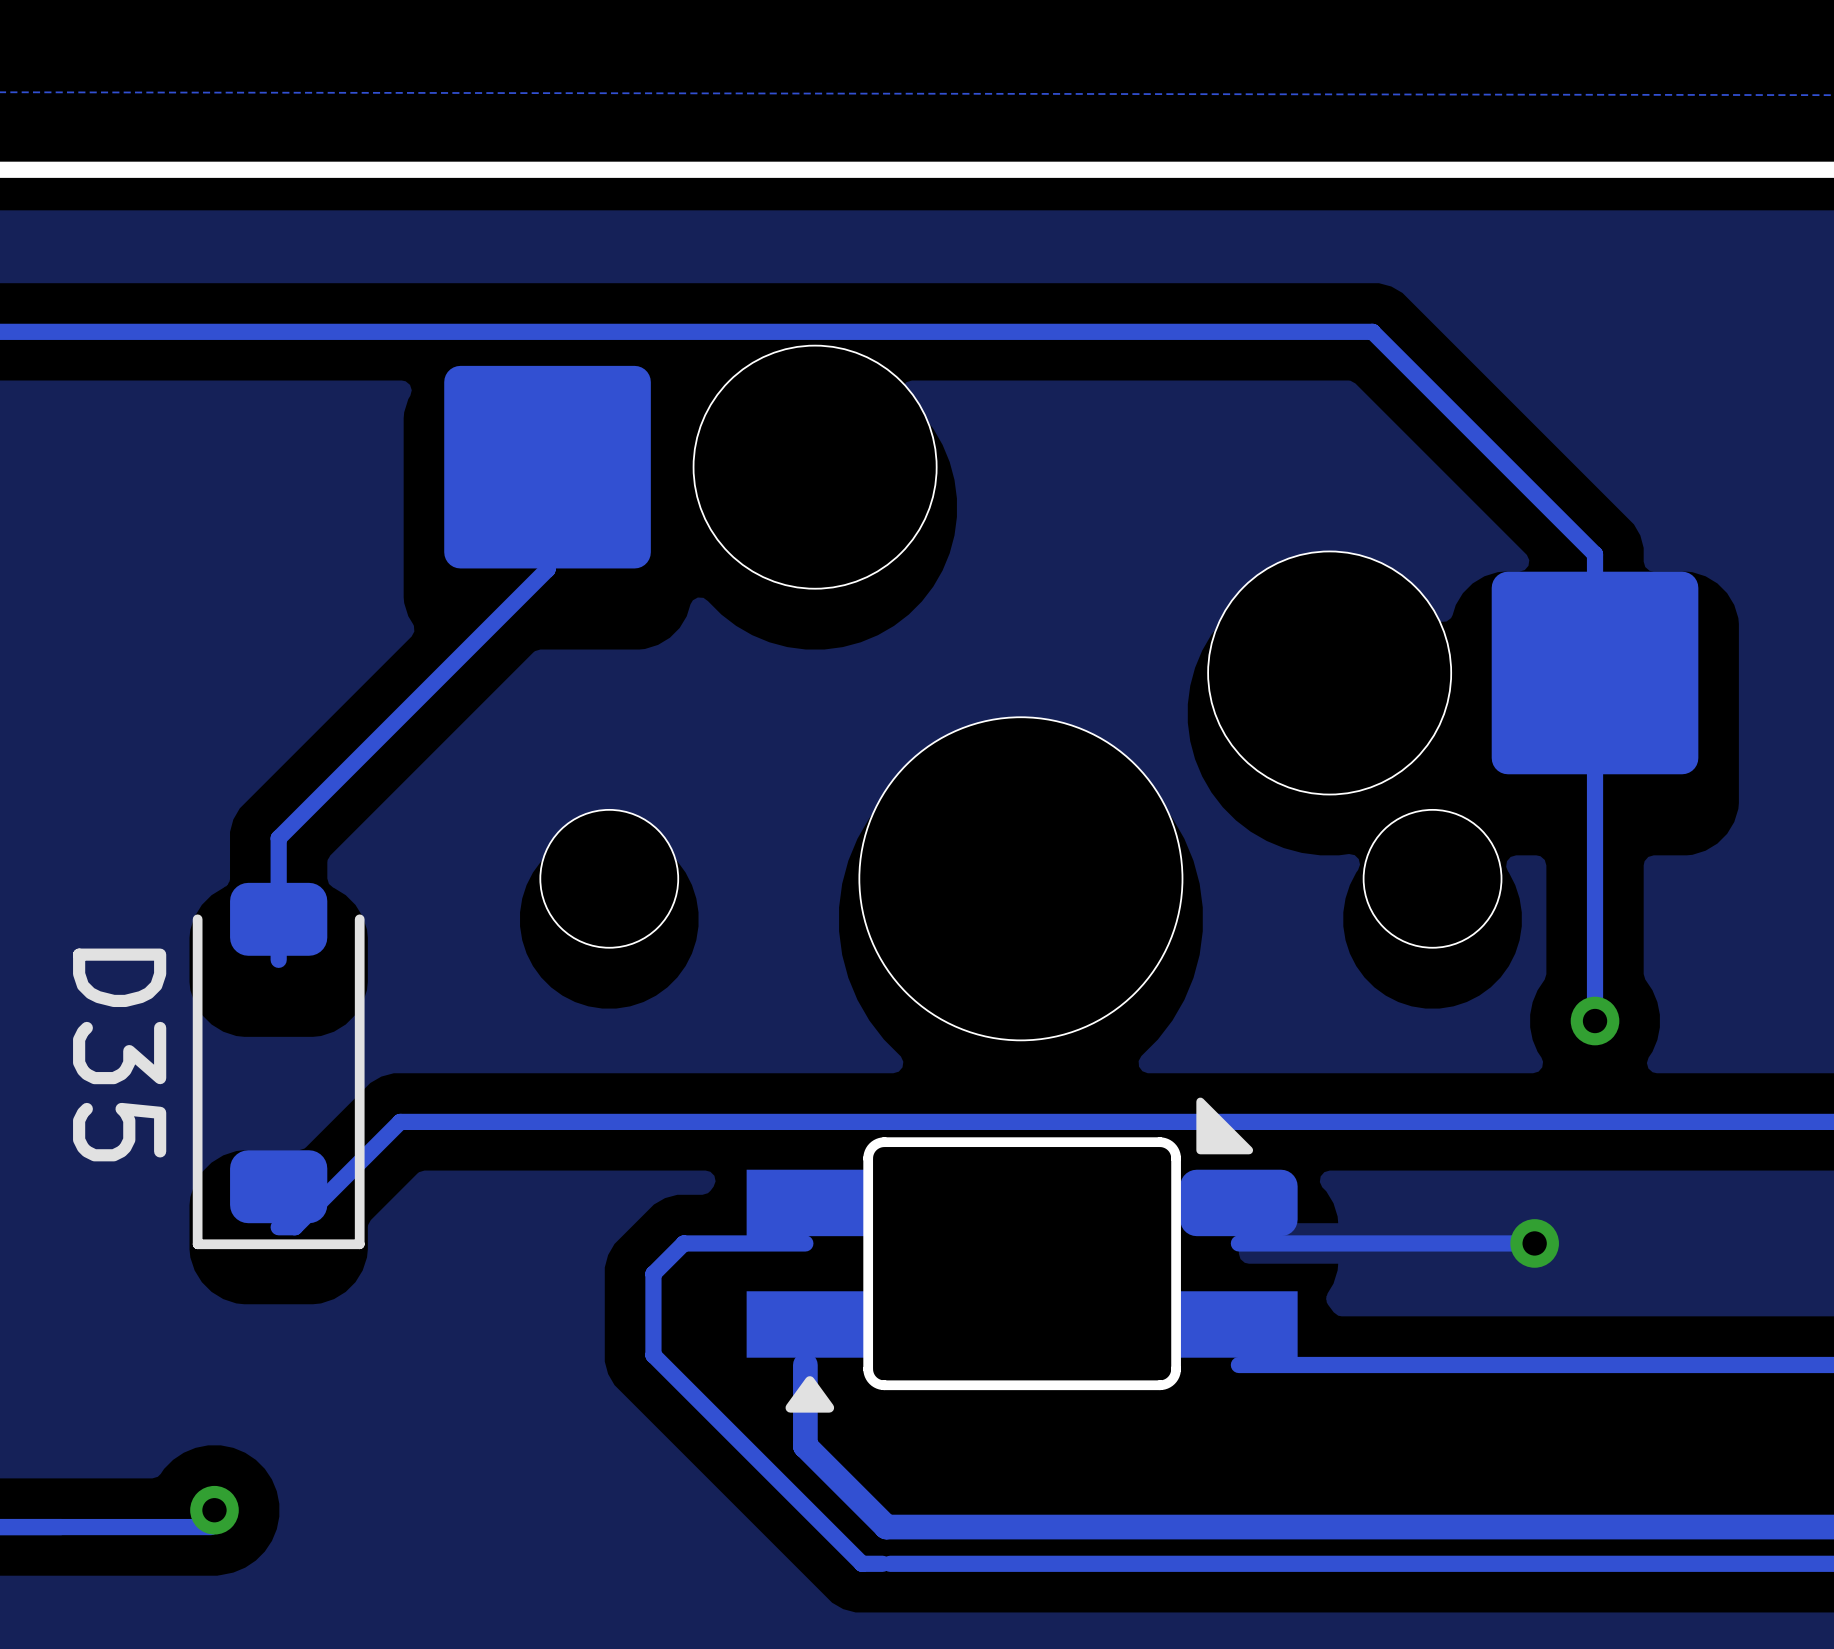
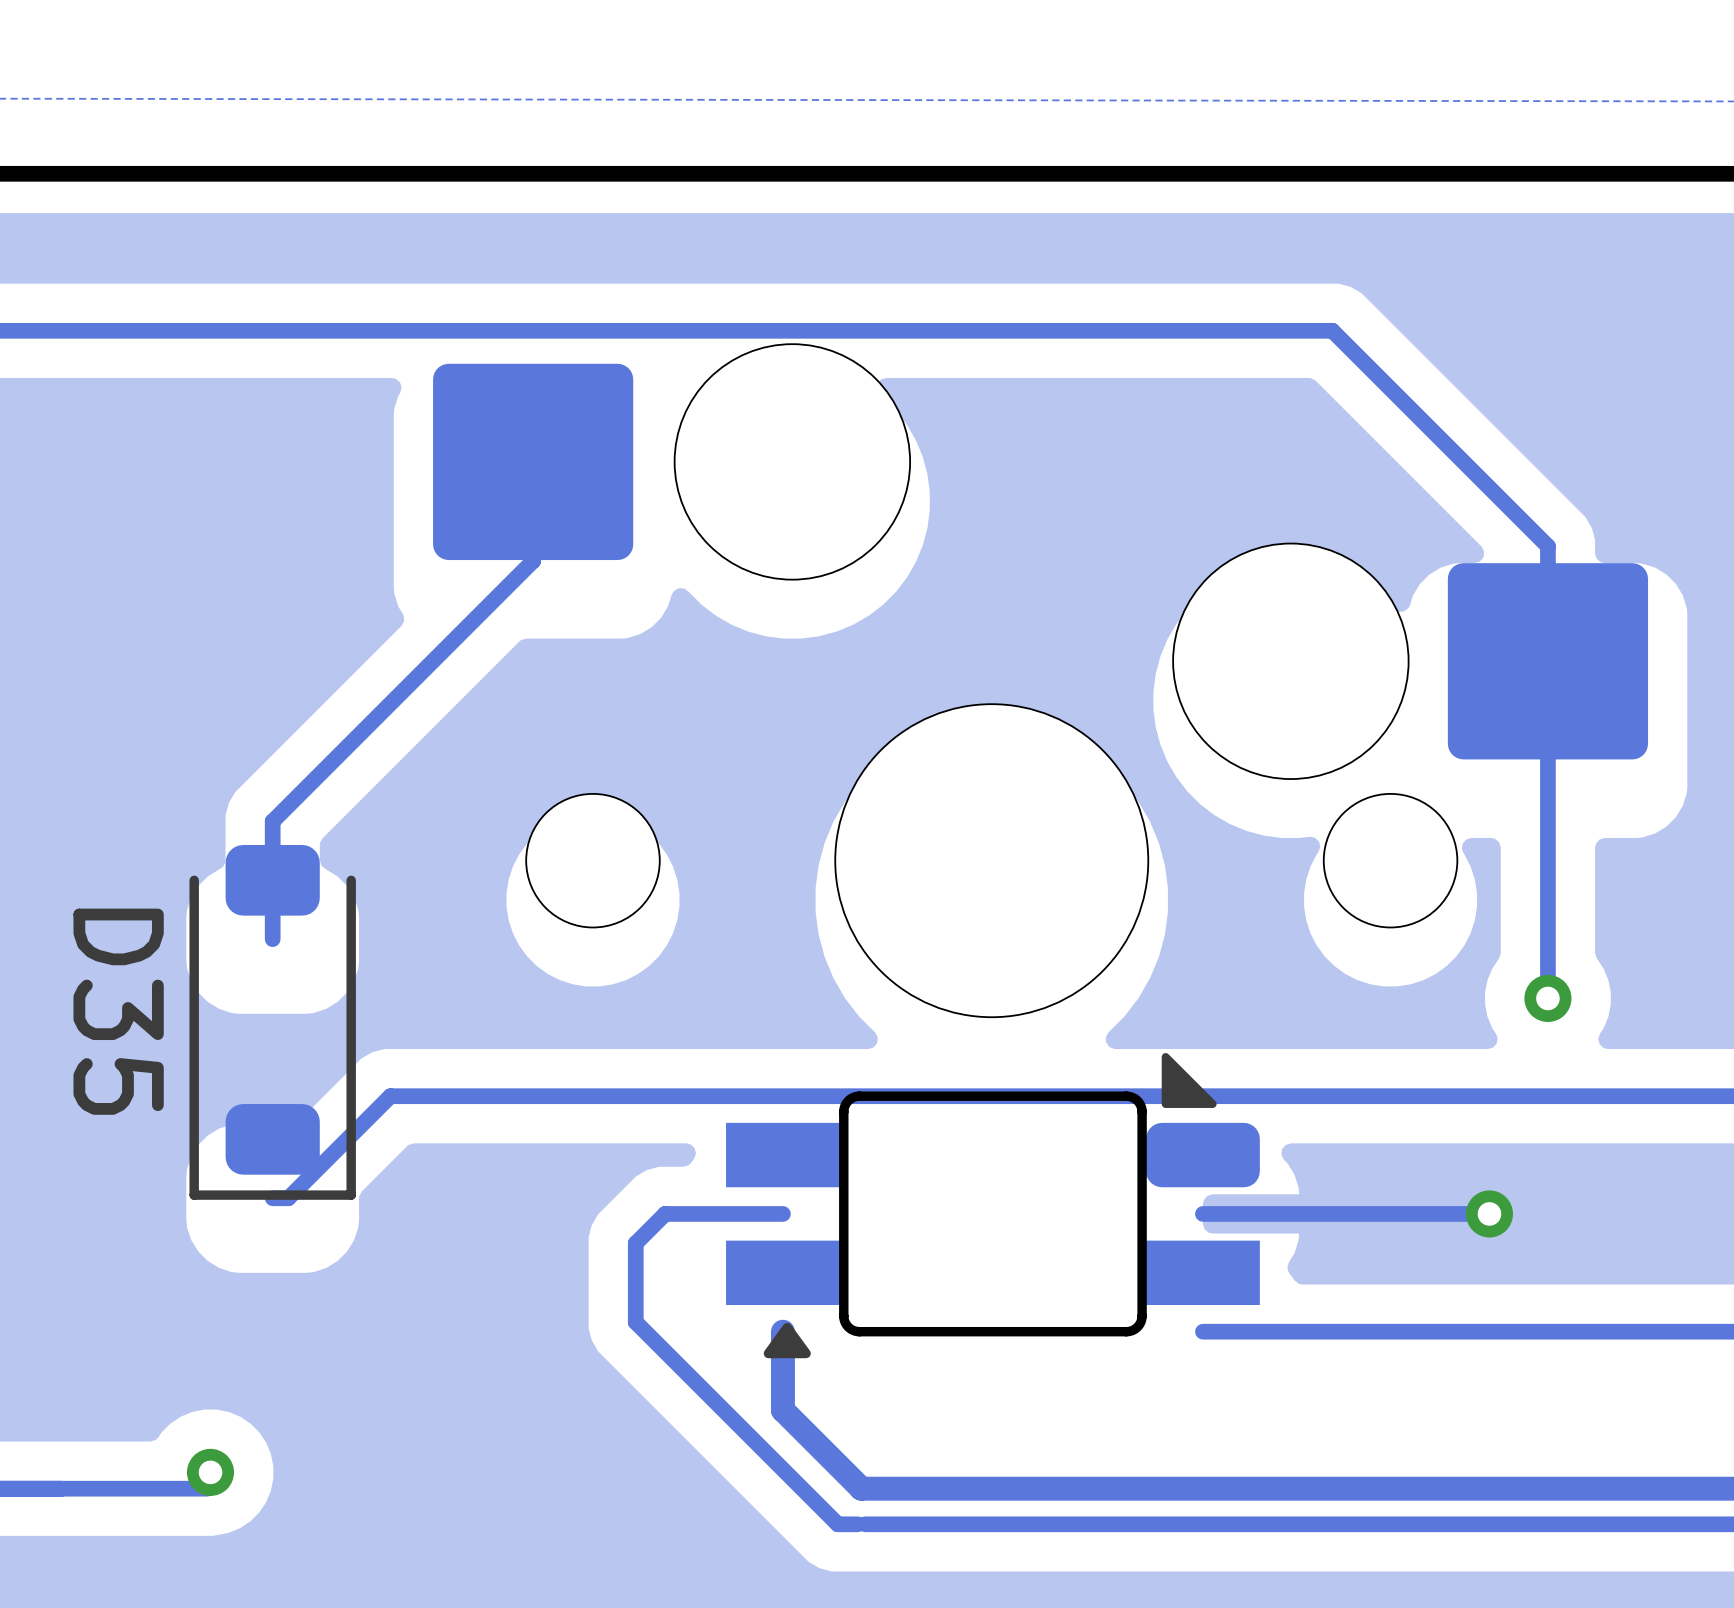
D35 position: (278, 1065) -> (272, 1022)
part position: (1022, 1255) -> (992, 1205)

